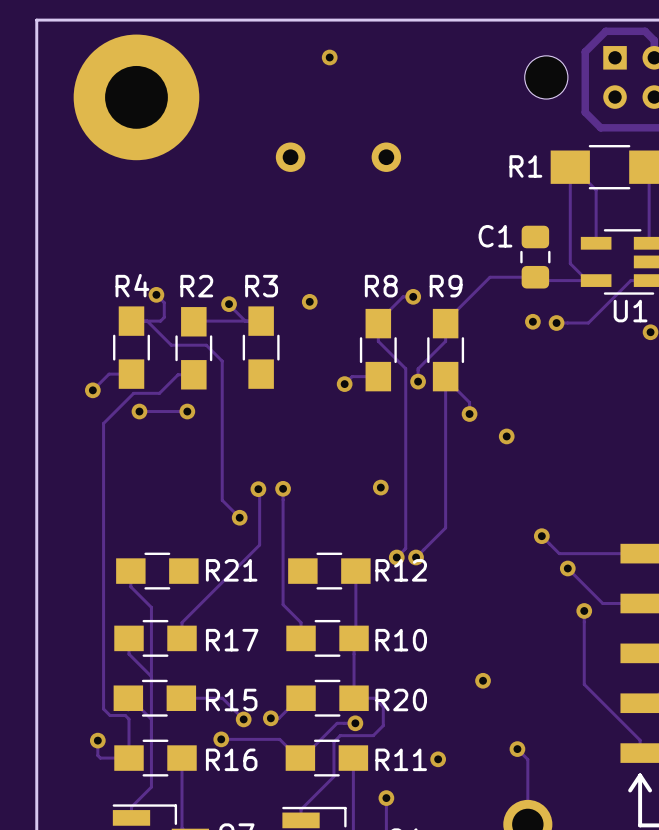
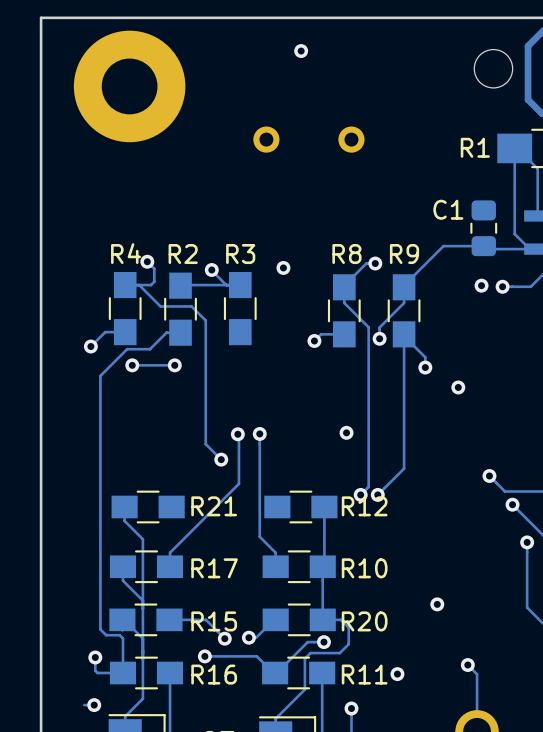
track: none -> (94, 705) (84, 705)
via: none -> (94, 705)

